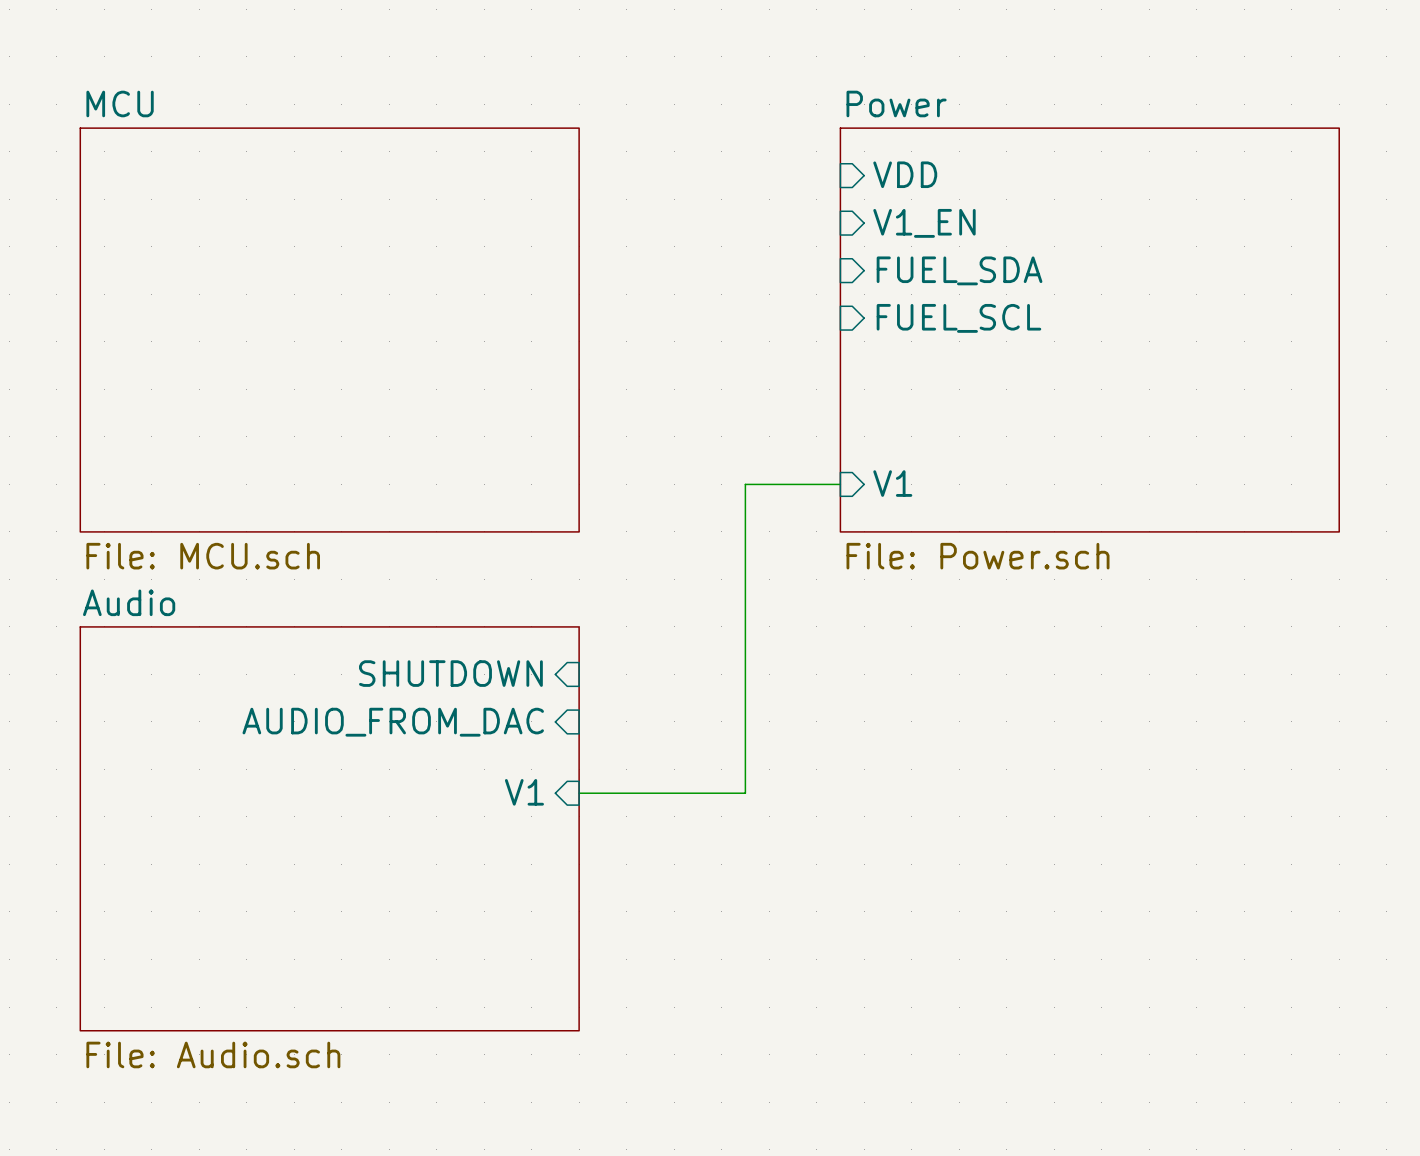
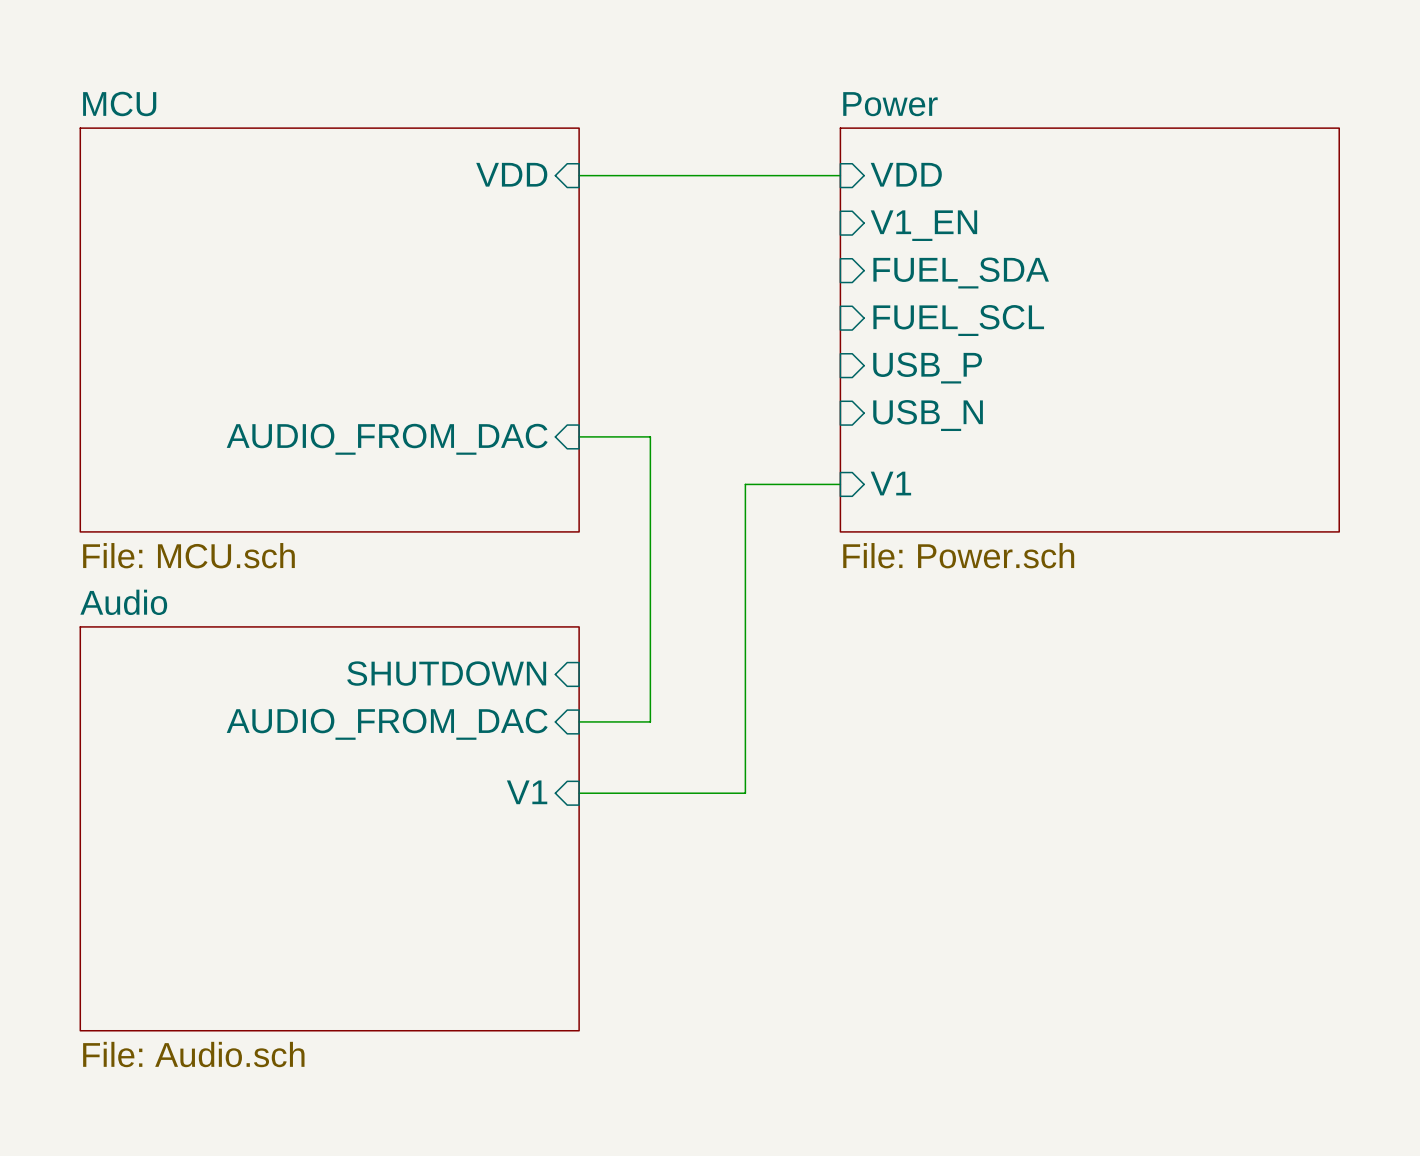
sheet pin: none -> VDD (511, 174)
wire: none -> (579, 175) (840, 175)
sheet pin: none -> USB_P (927, 368)
sheet pin: none -> USB_N (928, 415)
wire: none -> (579, 436) (650, 436) (650, 721) (579, 721)
sheet pin: none -> AUDIO_FROM_DAC (387, 439)

